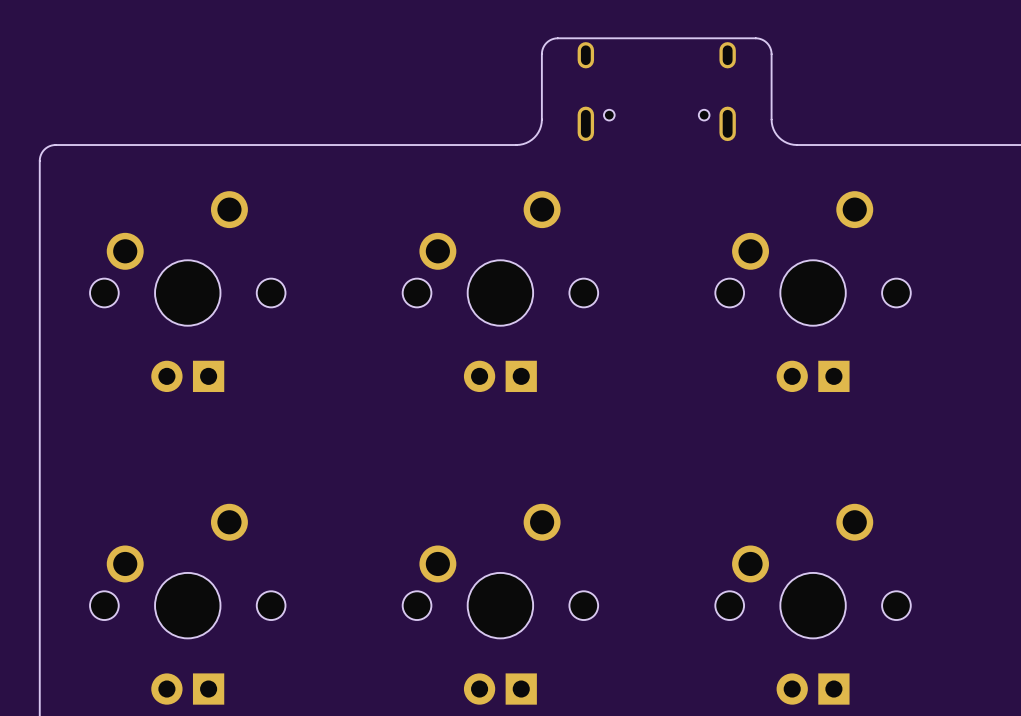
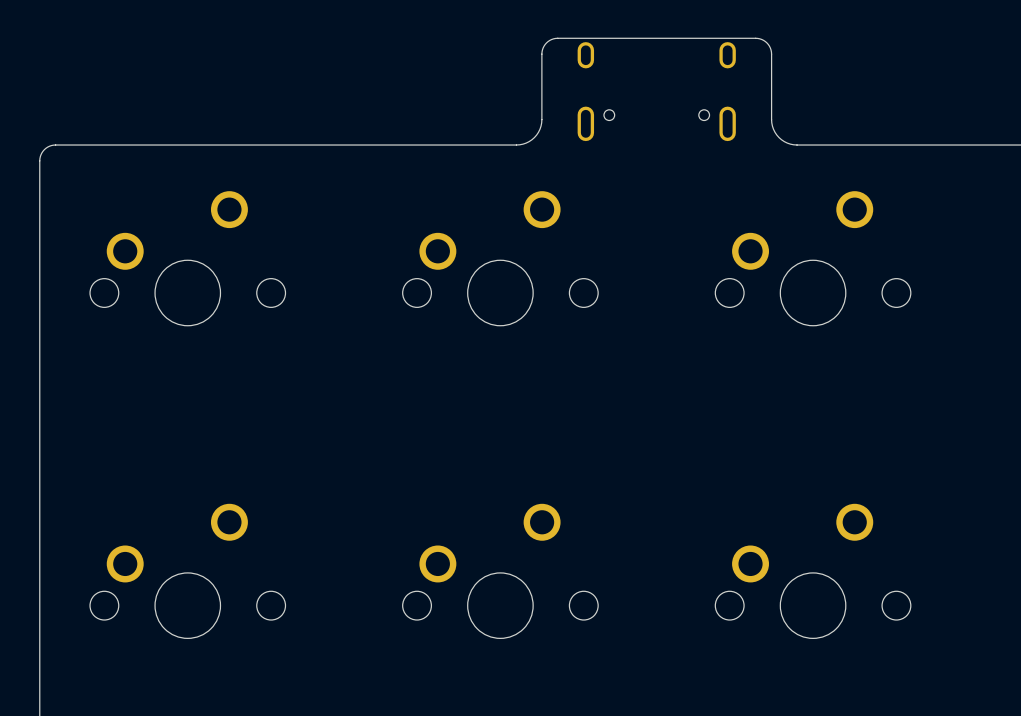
part: (187, 291) -> none
part: (500, 291) -> none
part: (813, 291) -> none
part: (187, 604) -> none
part: (500, 604) -> none
part: (813, 604) -> none

